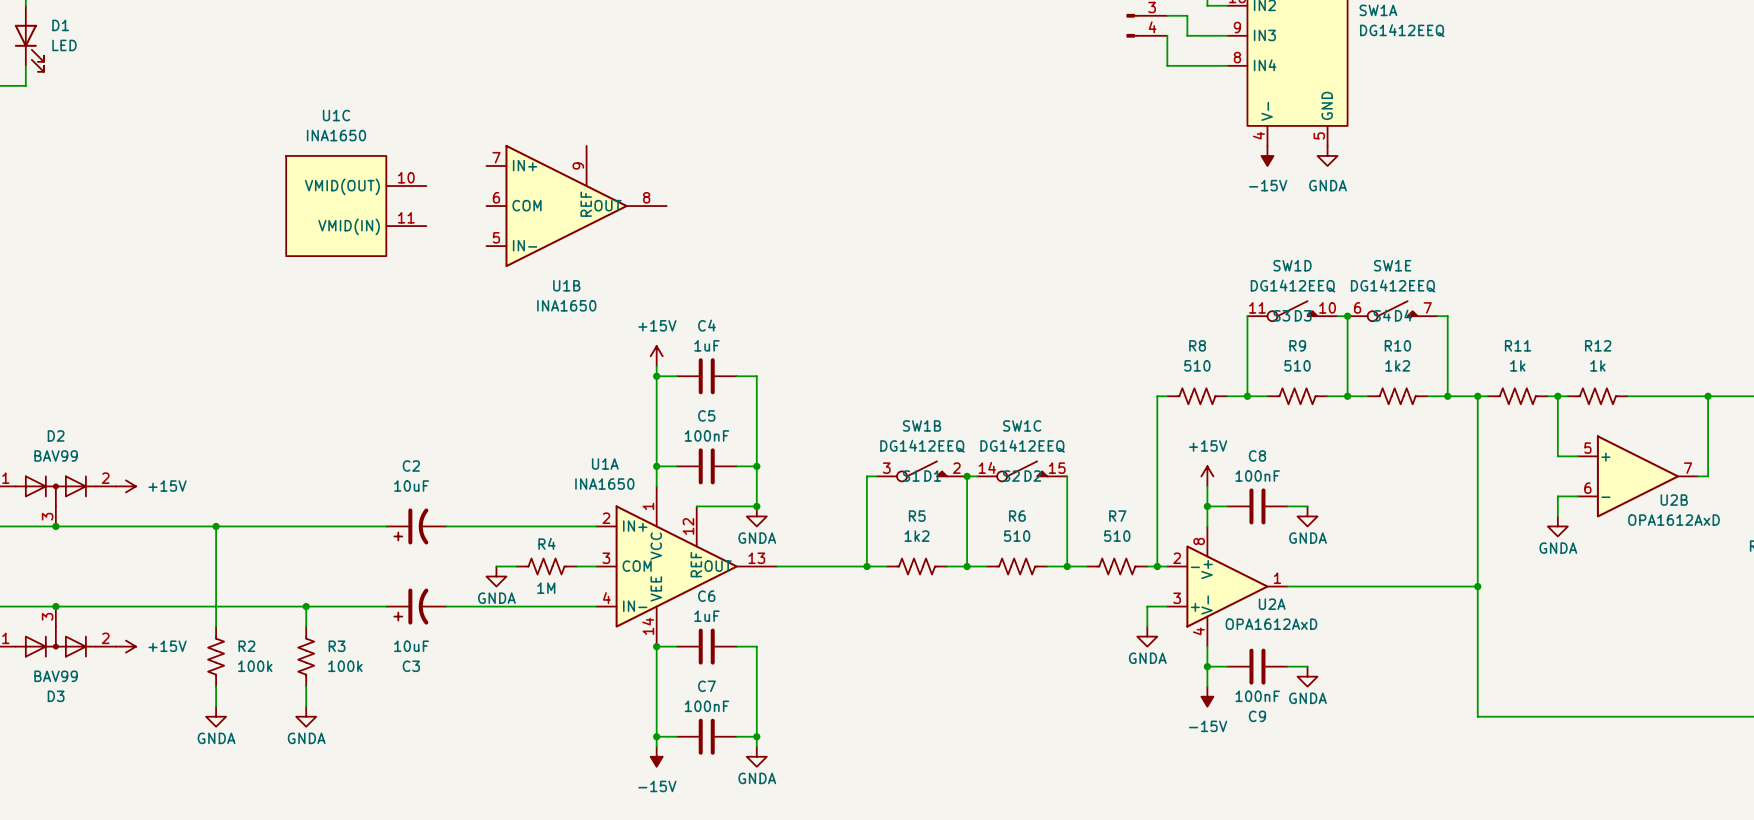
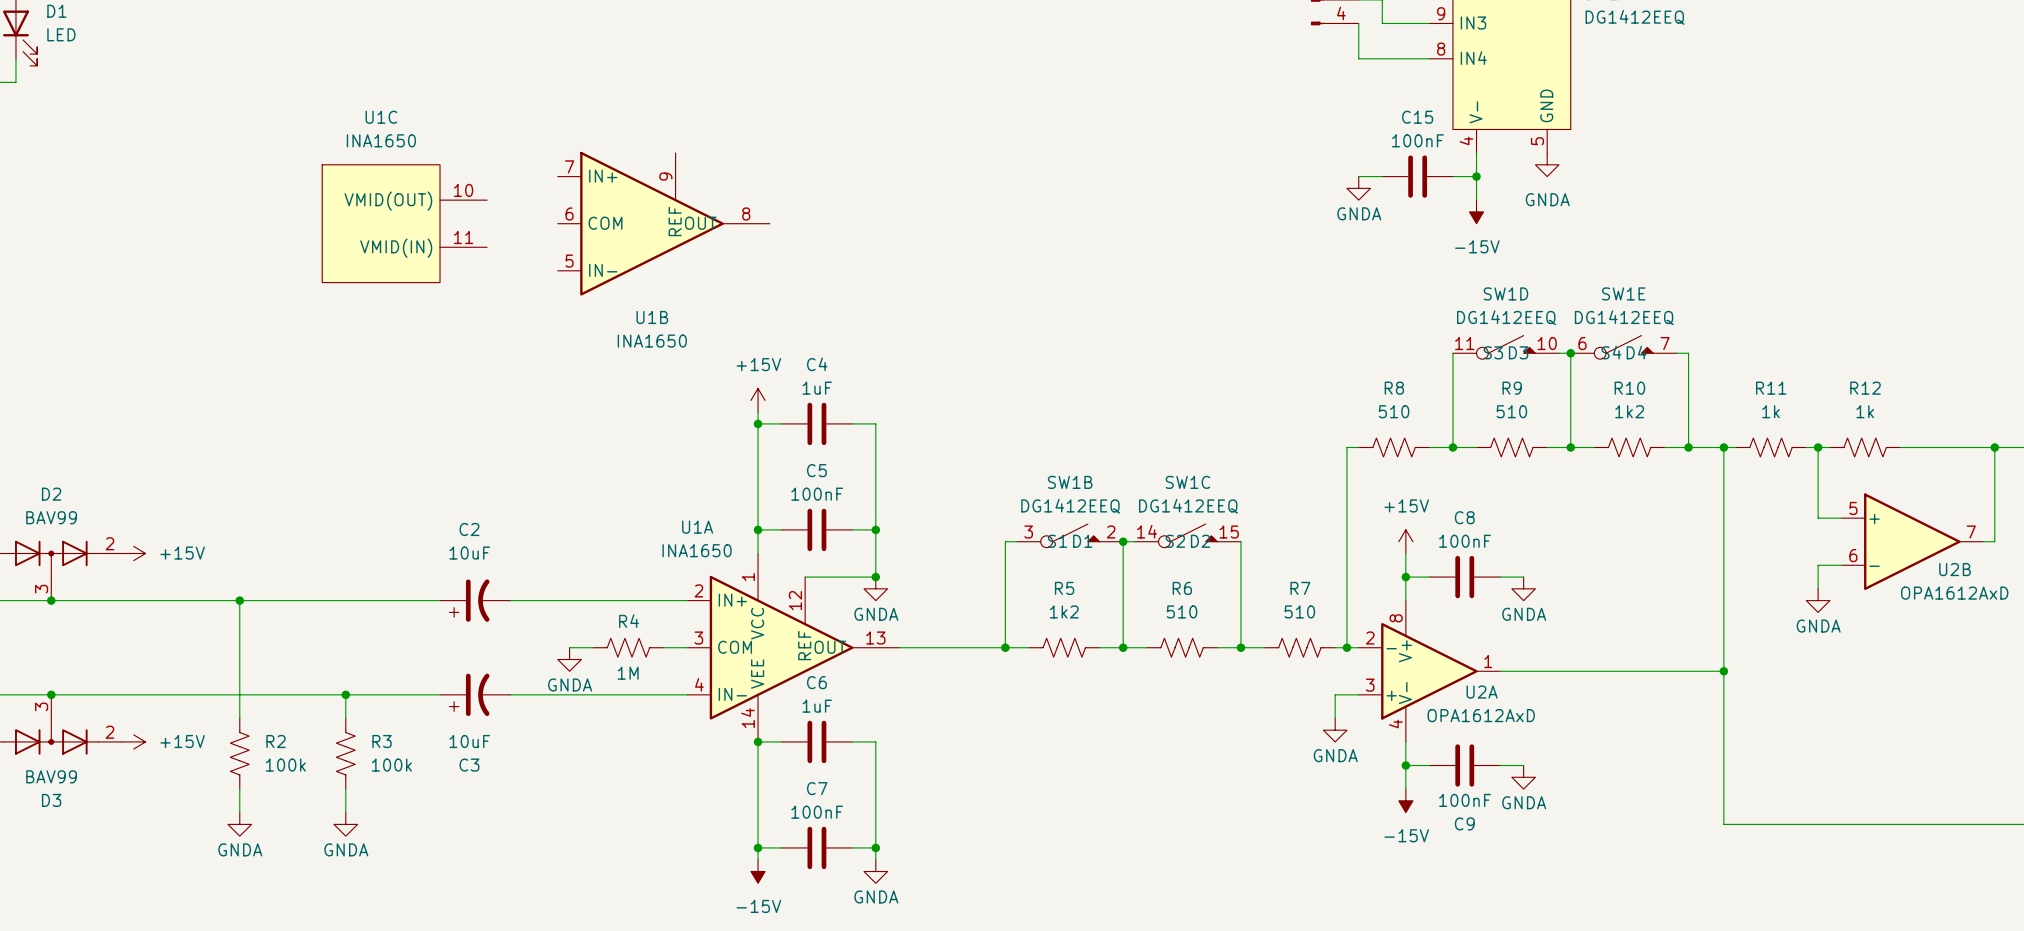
wire: none -> (1476, 153) (1476, 200)
power symbol position: -15V (1267, 155) -> -15V (1476, 211)
wire: none -> (1358, 176) (1382, 176)
C15: none -> 100nF (1417, 176)
wire: none -> (1452, 176) (1476, 176)
junction: none -> (1476, 176)
power symbol: none -> GNDA (1358, 188)

